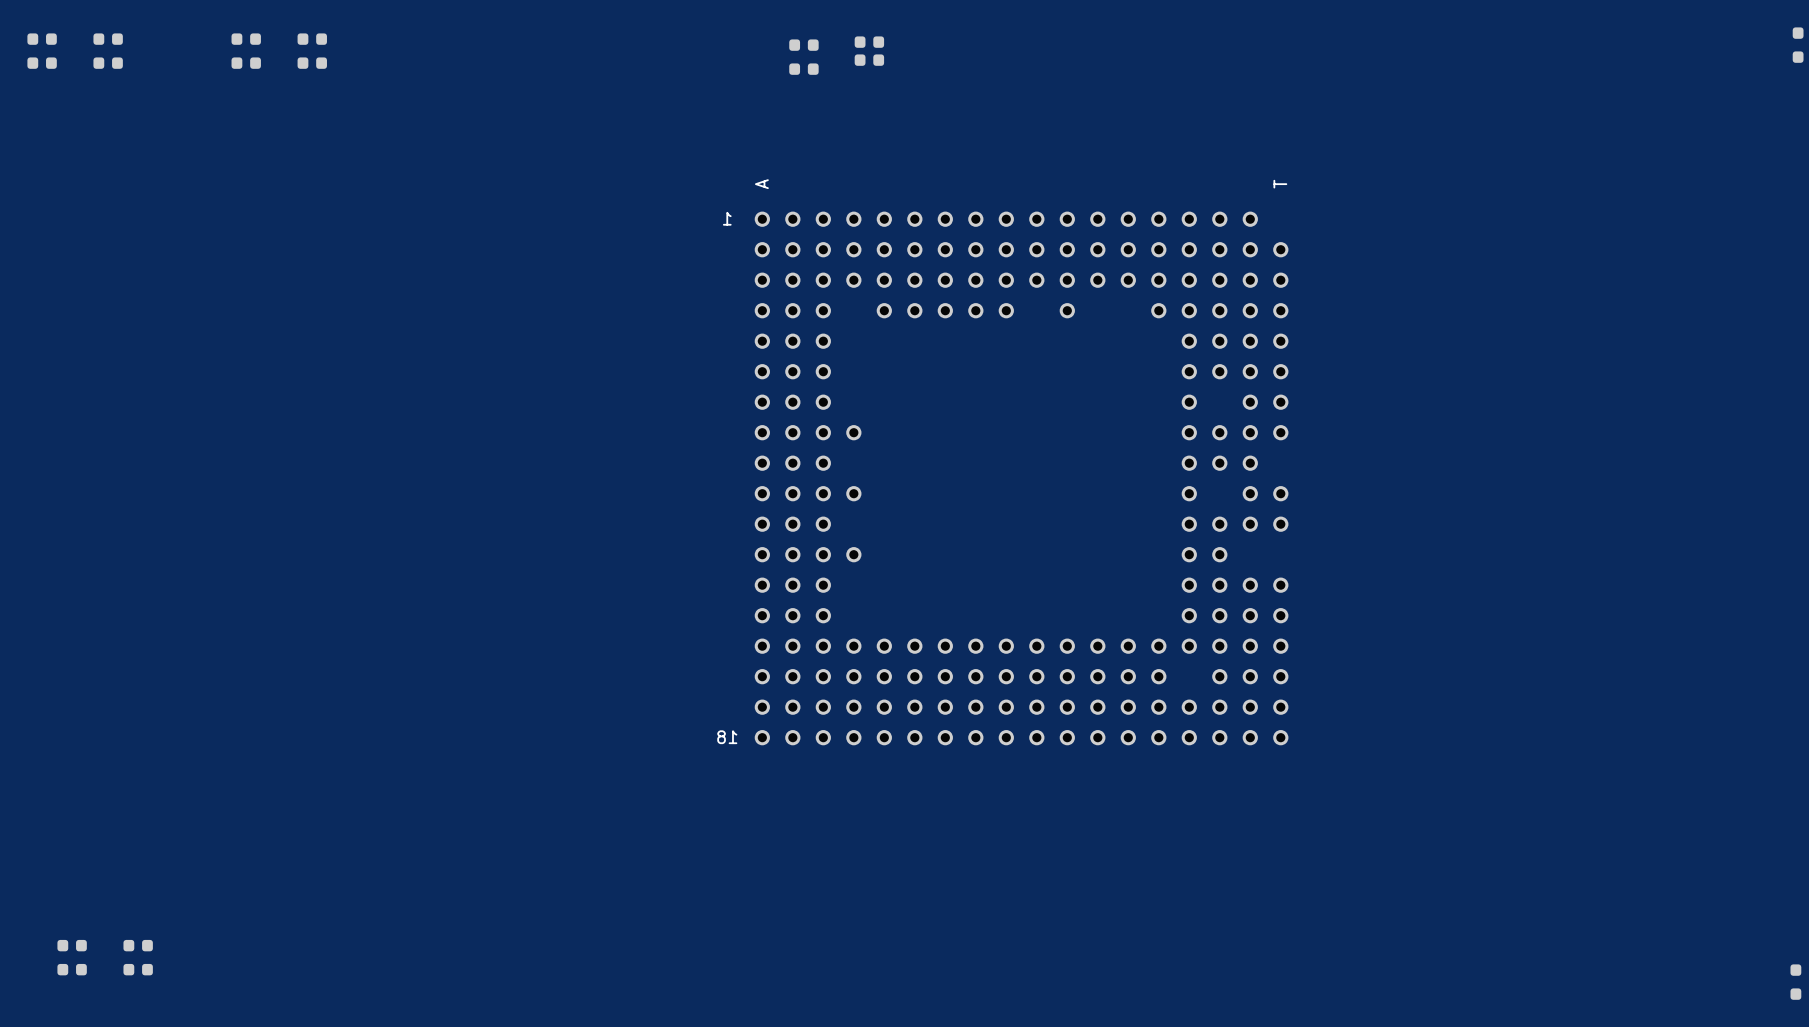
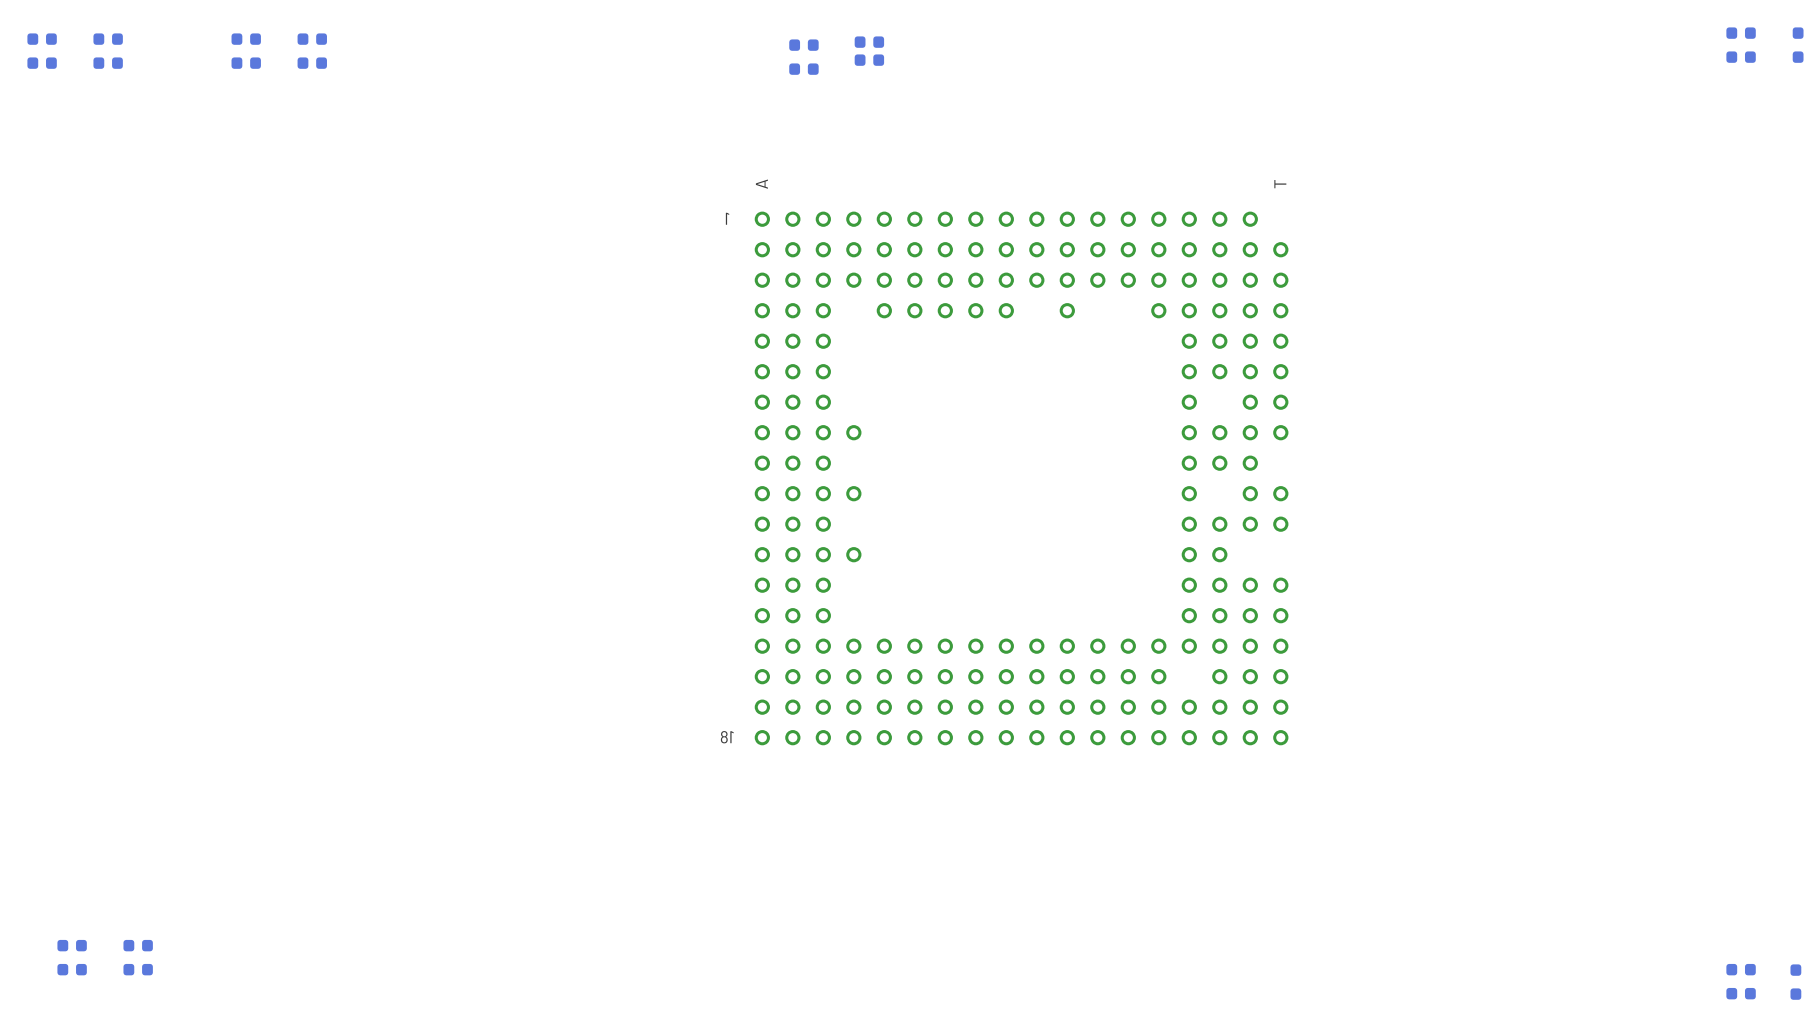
part: none -> (1731, 33)
part: none -> (1750, 33)
part: none -> (1731, 57)
part: none -> (1750, 57)
part: none -> (1731, 969)
part: none -> (1750, 969)
part: none -> (1731, 993)
part: none -> (1750, 993)

